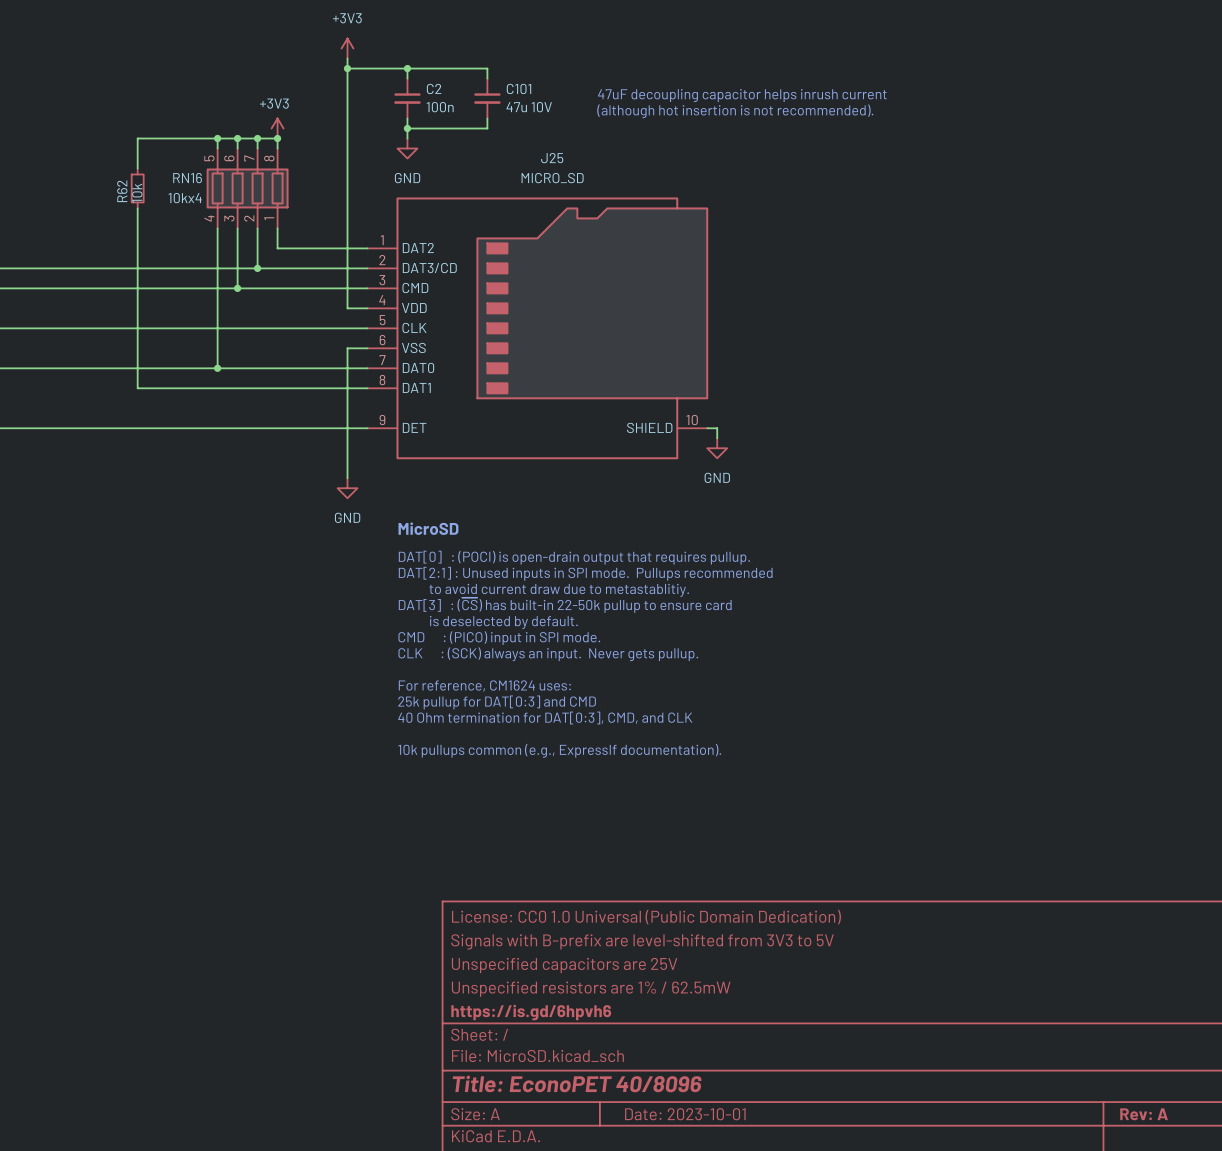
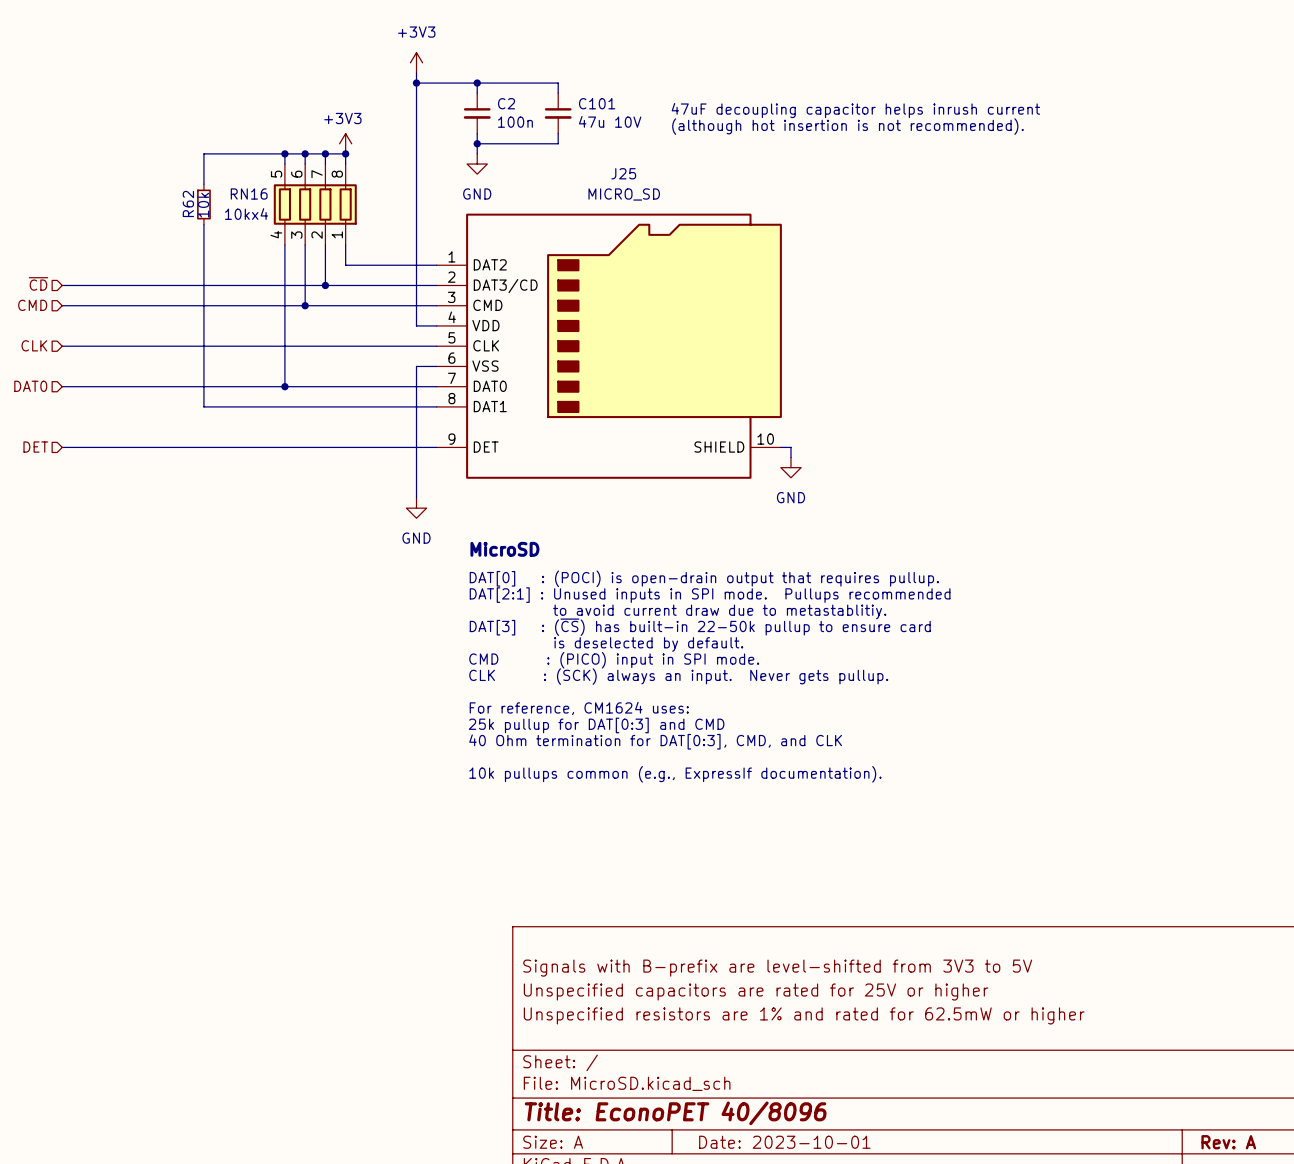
title block: License: CC0 1.0 Universal (Public Domain Dedication) (646, 917) -> none
title block: Unspecified capacitors are 25V (564, 965) -> Unspecified capacitors are rated for 25V or higher (756, 992)
title block: Unspecified resistors are 1% / 62.5mW (591, 989) -> Unspecified resistors are 1% and rated for 62.5mW or higher (804, 1015)
title block: https://is.gd/6hpvh6 (531, 1012) -> none

